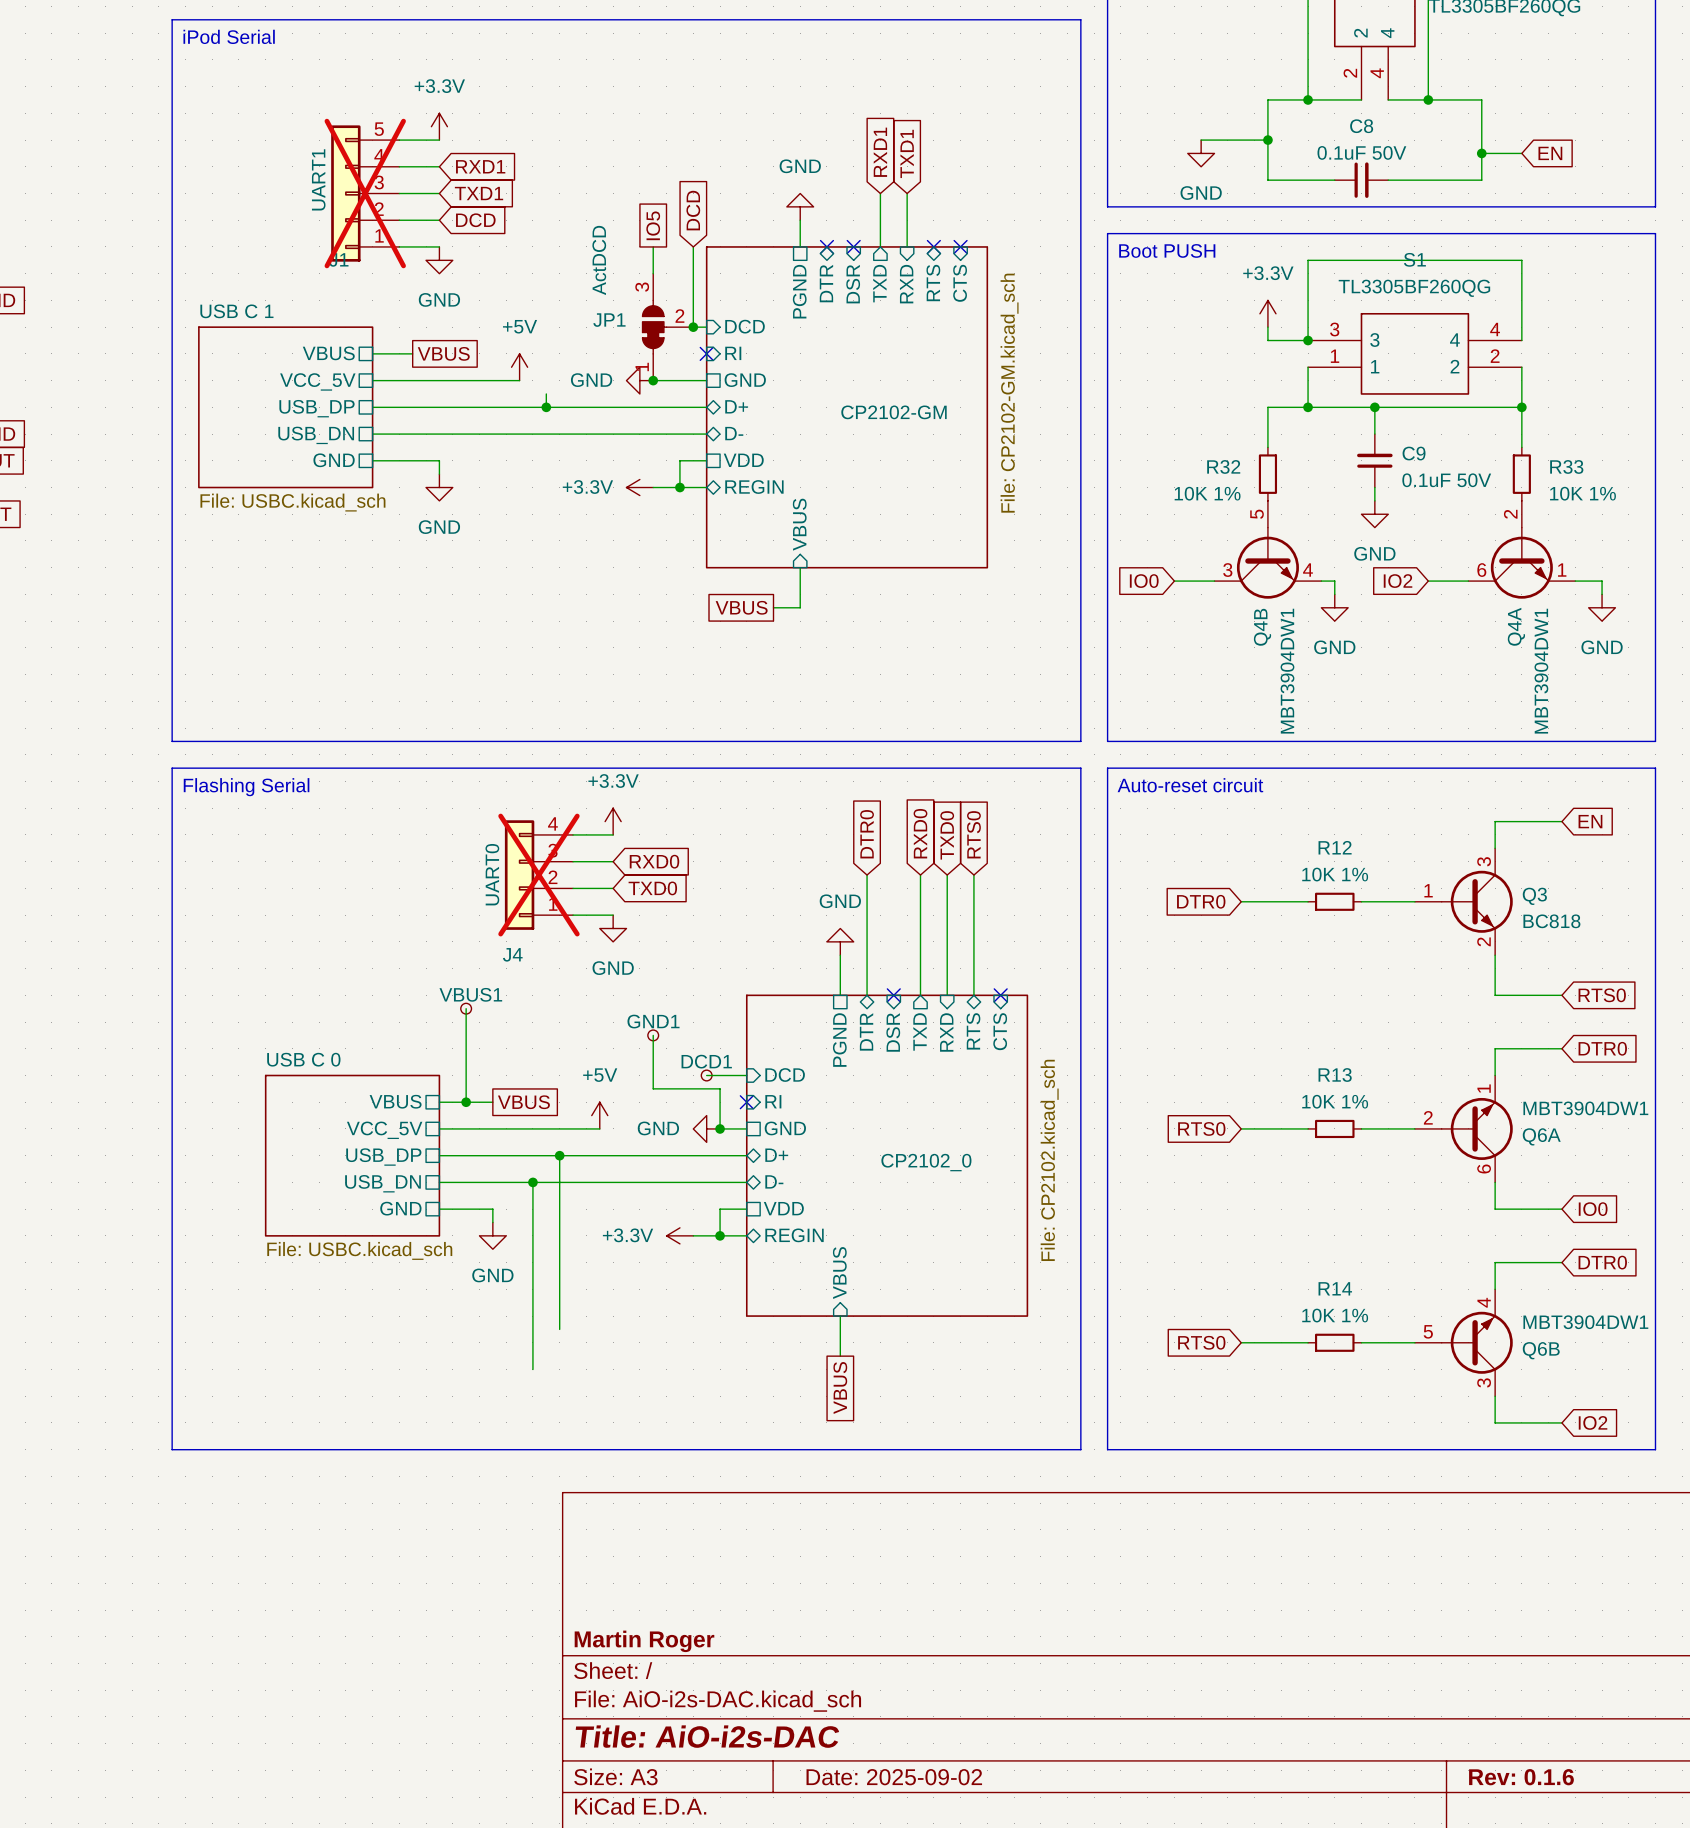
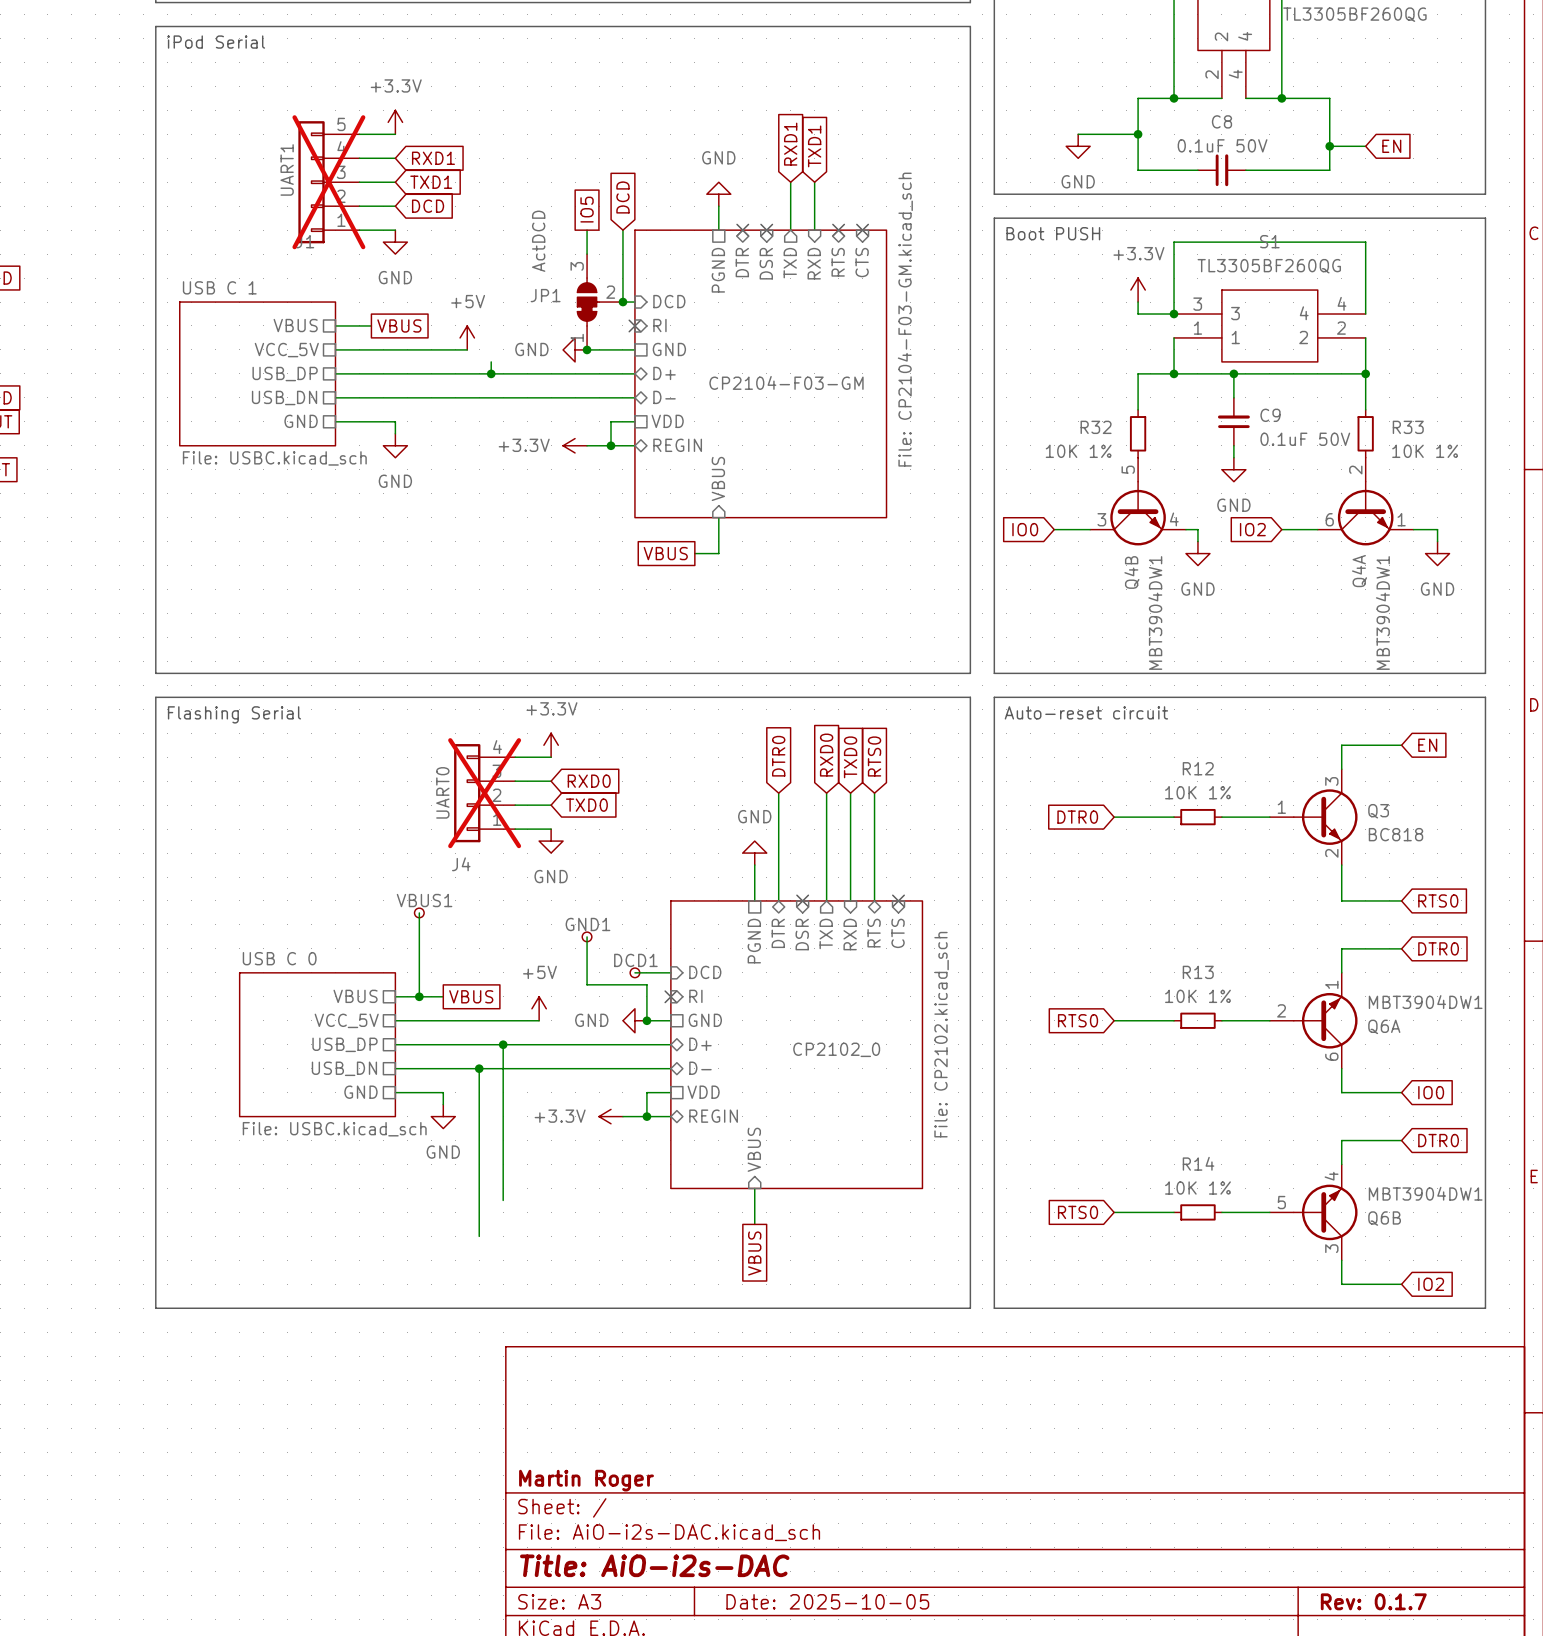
sheet CP2102-GM value: File: CP2102-GM.kicad_sch (1009, 393) -> File: CP2104-F03-GM.kicad_sch (905, 319)
sheet CP2102-GM name: CP2102-GM (893, 412) -> CP2104-F03-GM (786, 382)
title block: Date: 2025-09-02 (894, 1777) -> Date: 2025-10-05 (827, 1601)
title block: Rev: 0.1.6 (1521, 1777) -> Rev: 0.1.7 (1373, 1601)

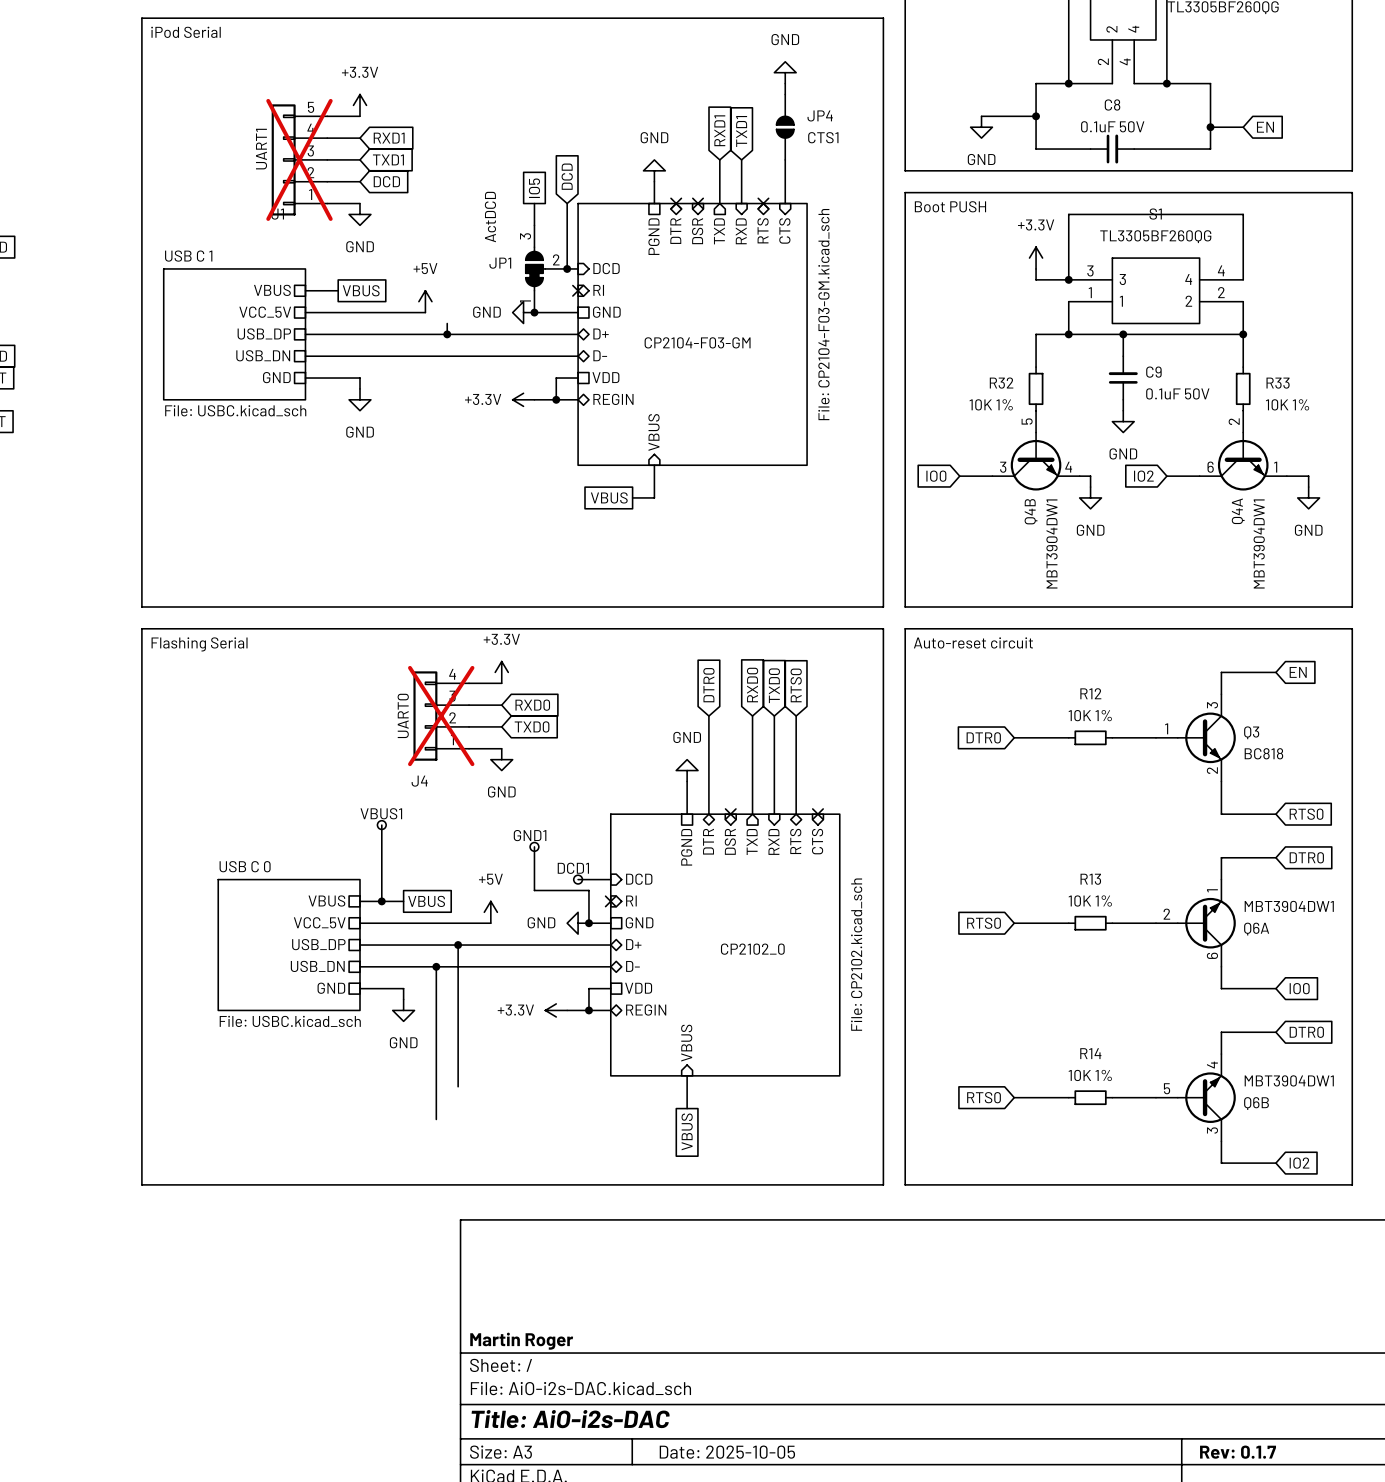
power symbol: none -> GND (785, 72)
wire: none -> (785, 83) (785, 94)
JP4: none -> CTS1 (785, 127)
wire: none -> (785, 159) (785, 203)
no-connect mark: (862, 230) -> none

